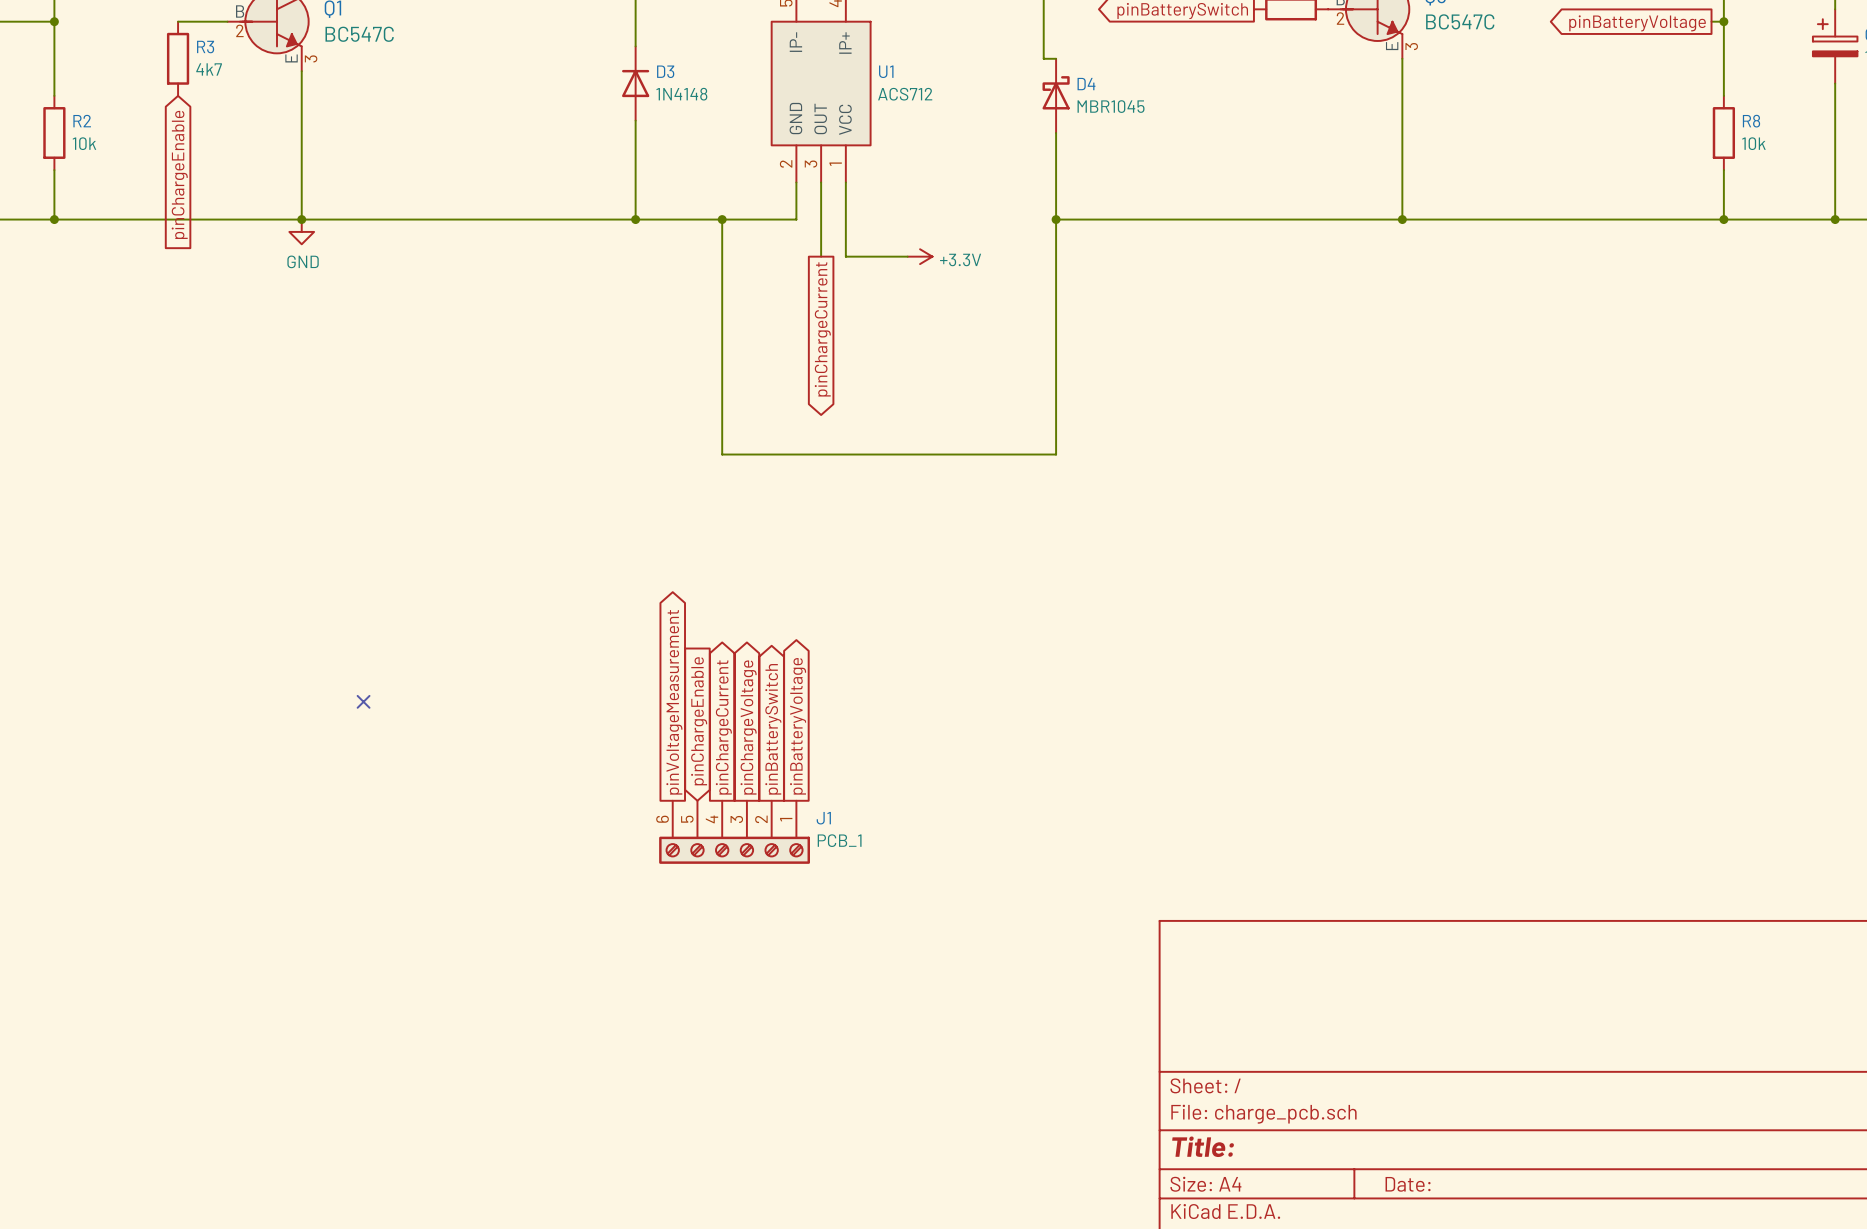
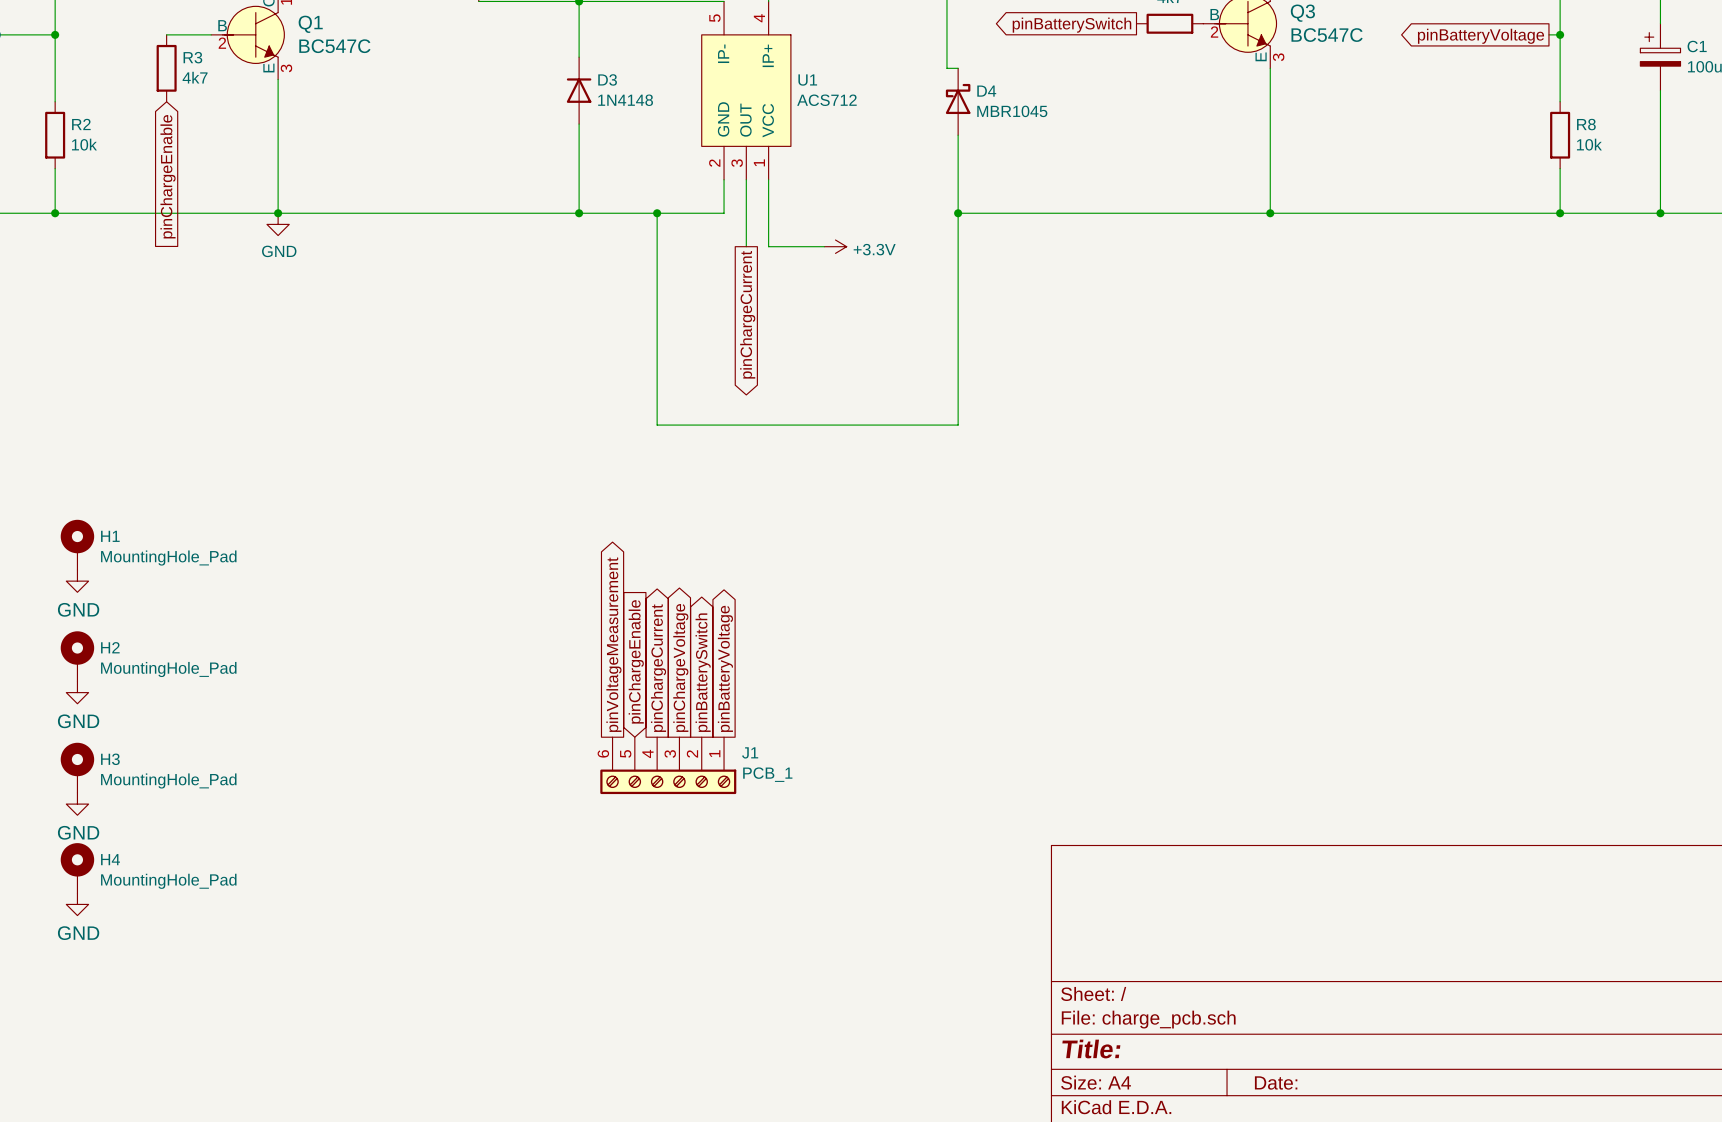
H1: none -> MountingHole_Pad (77, 544)
power symbol: none -> GND (77, 581)
no-connect mark: (363, 701) -> none
H2: none -> MountingHole_Pad (77, 656)
power symbol: none -> GND (77, 692)
H3: none -> MountingHole_Pad (77, 767)
power symbol: none -> GND (77, 804)
H4: none -> MountingHole_Pad (77, 868)
power symbol: none -> GND (77, 904)

